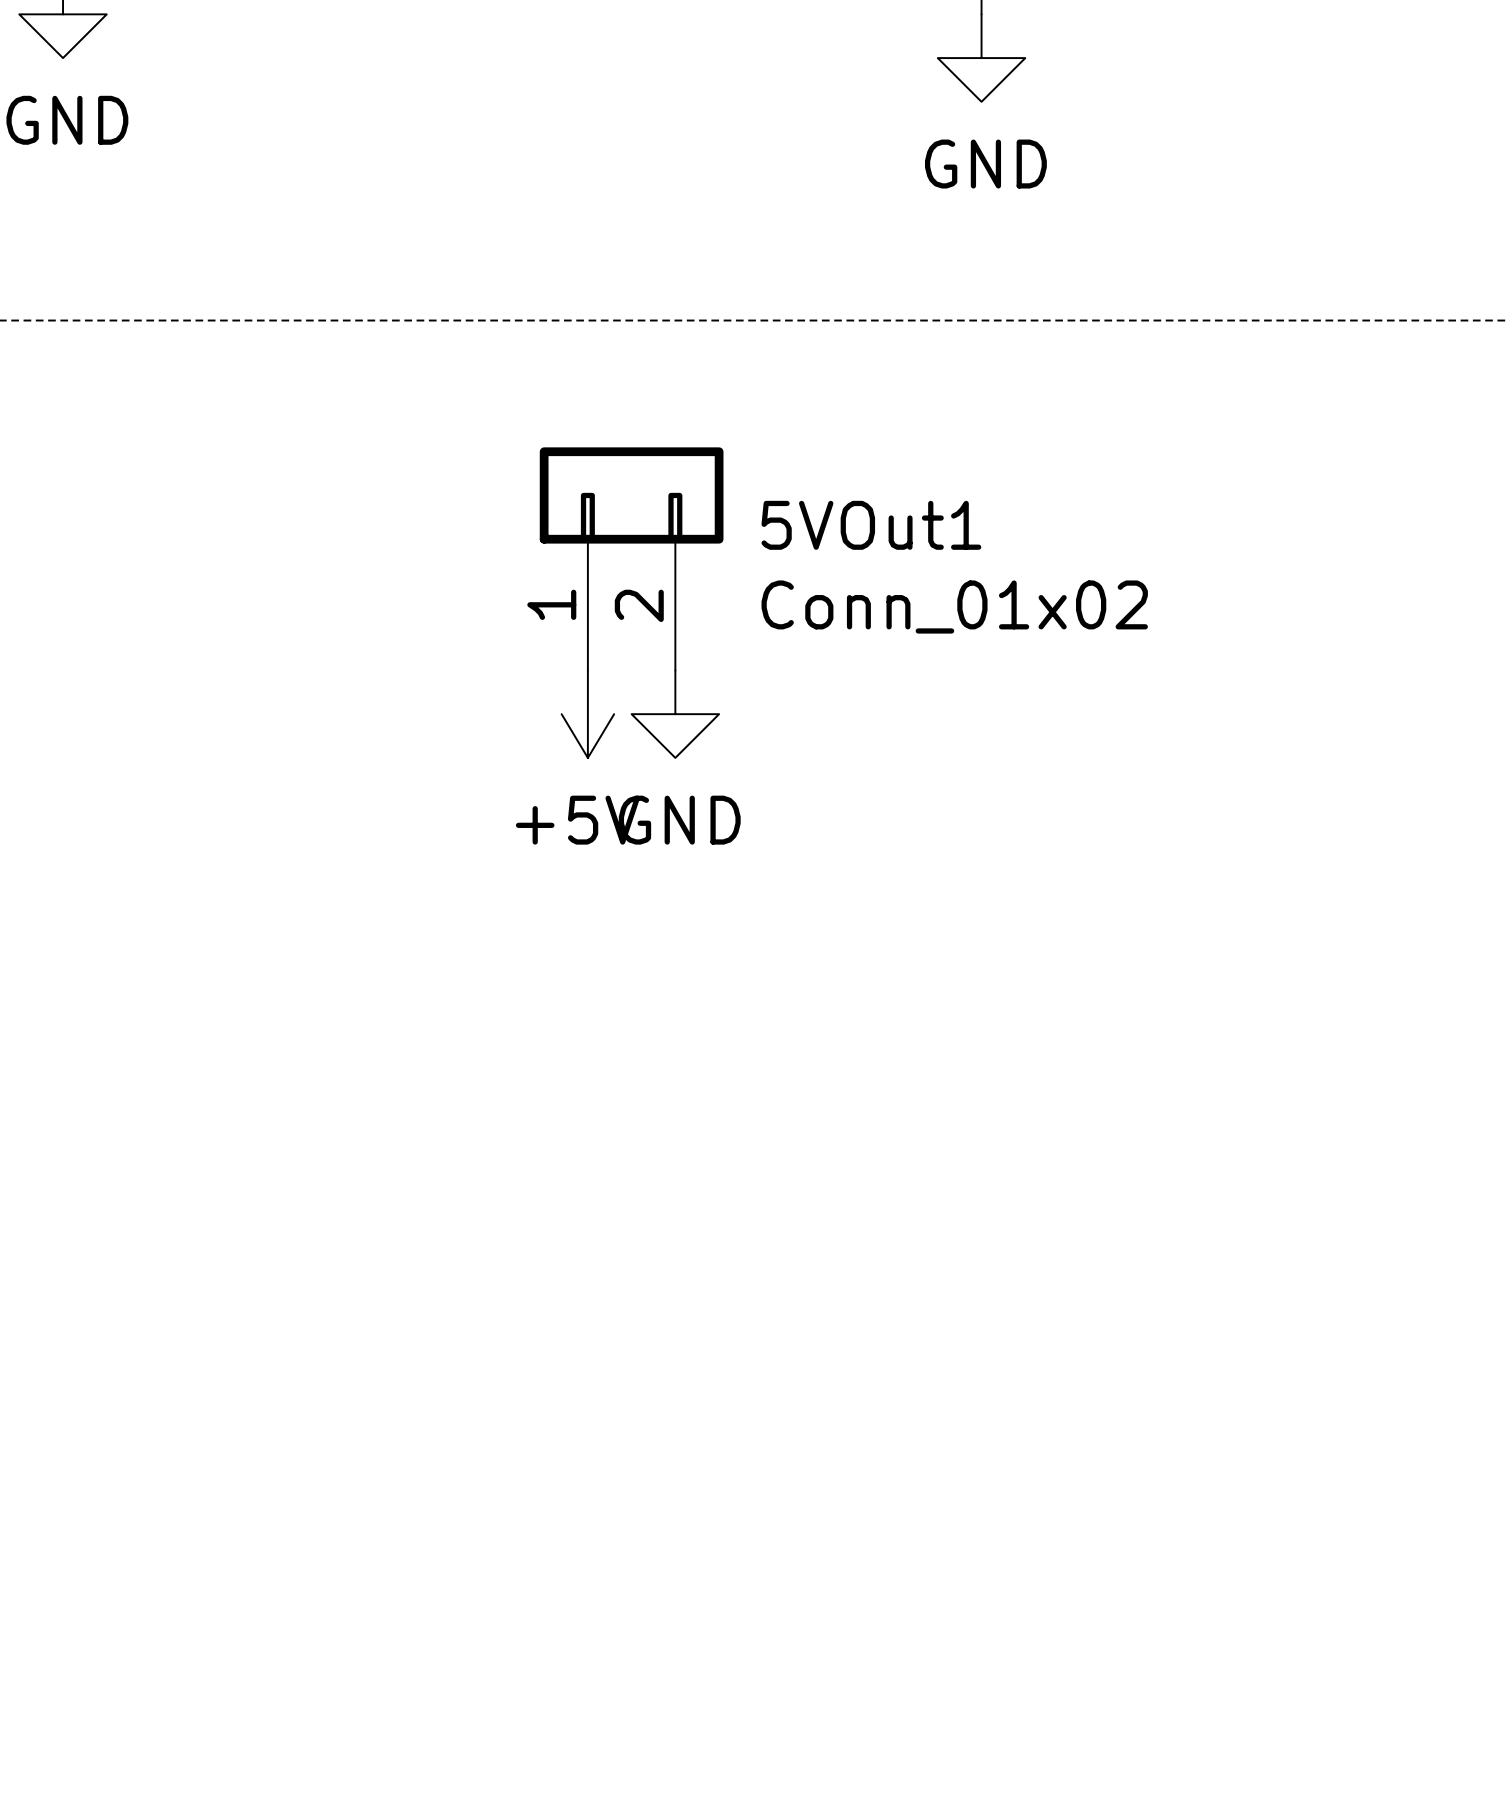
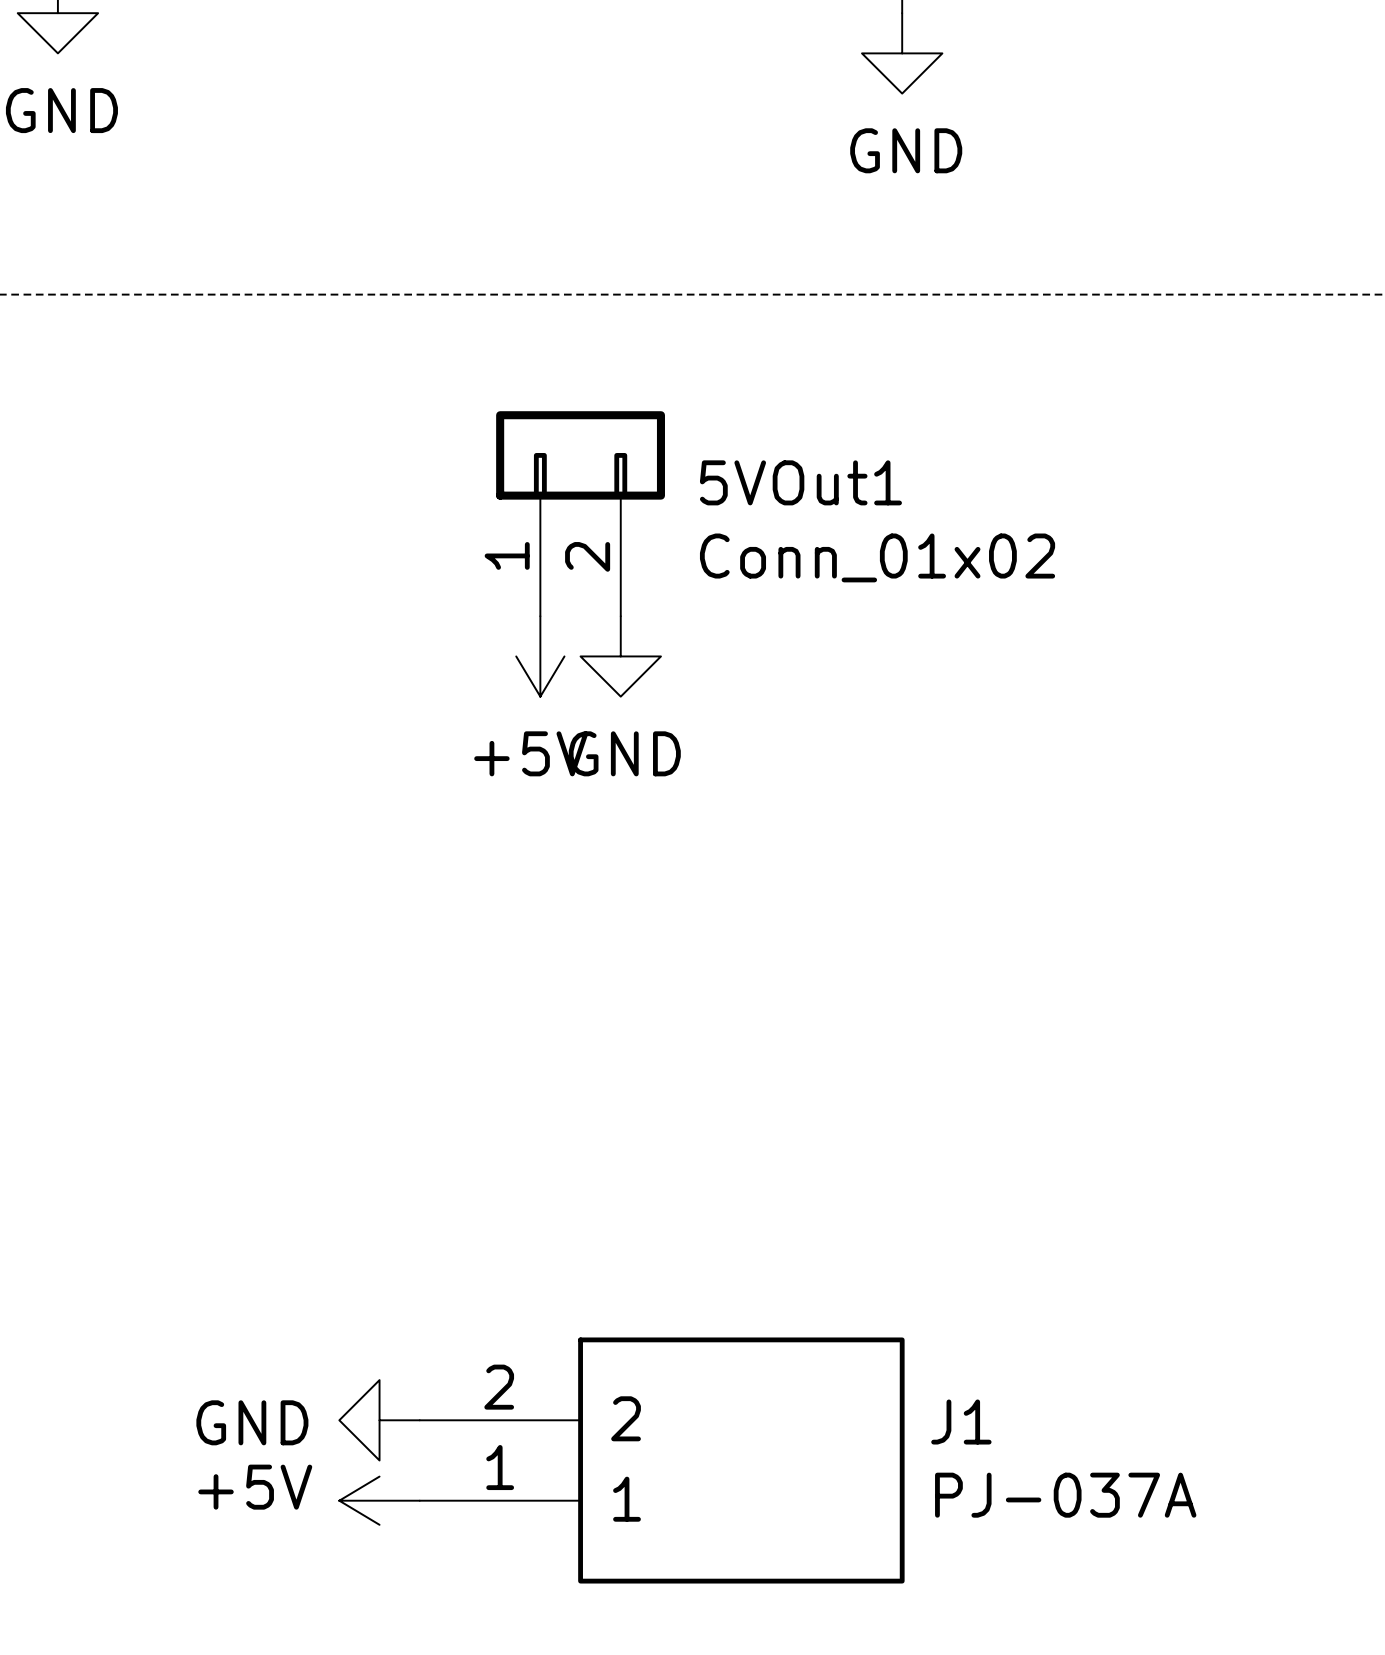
power symbol: none -> GND (379, 1420)
J1: none -> PJ-037A (662, 1460)
power symbol: none -> +5V (379, 1500)

